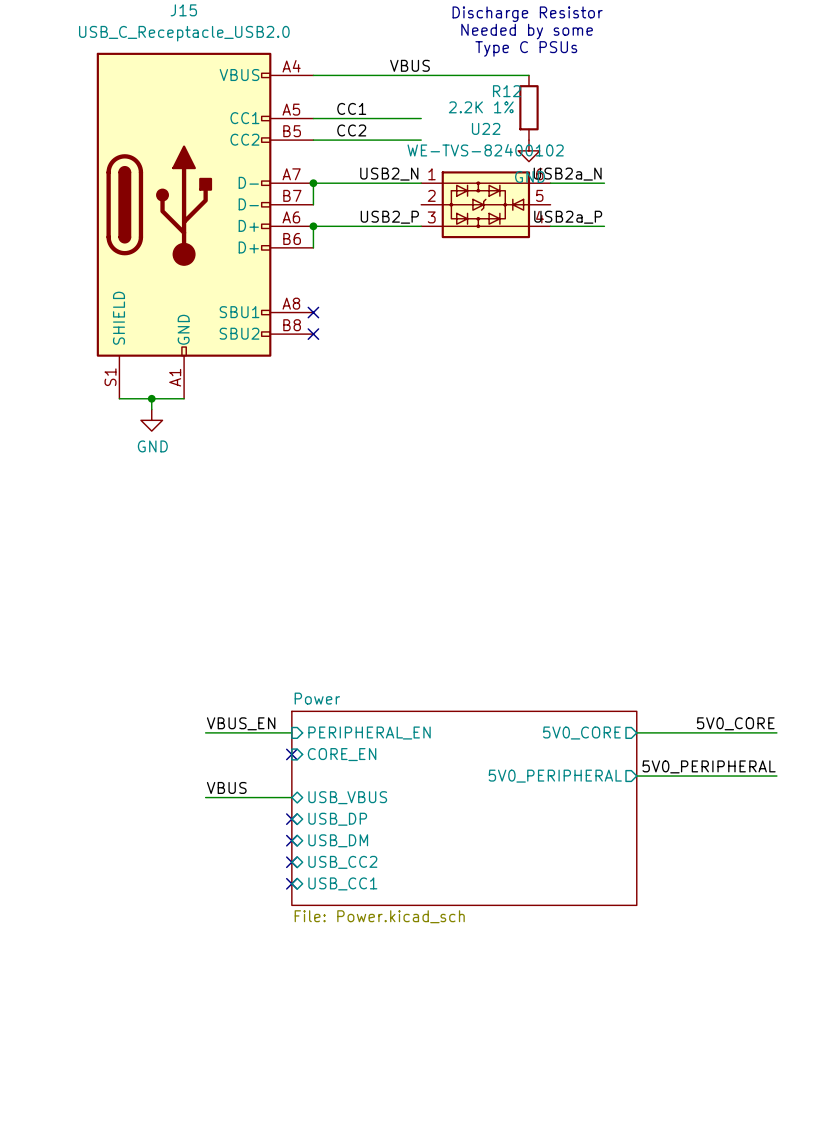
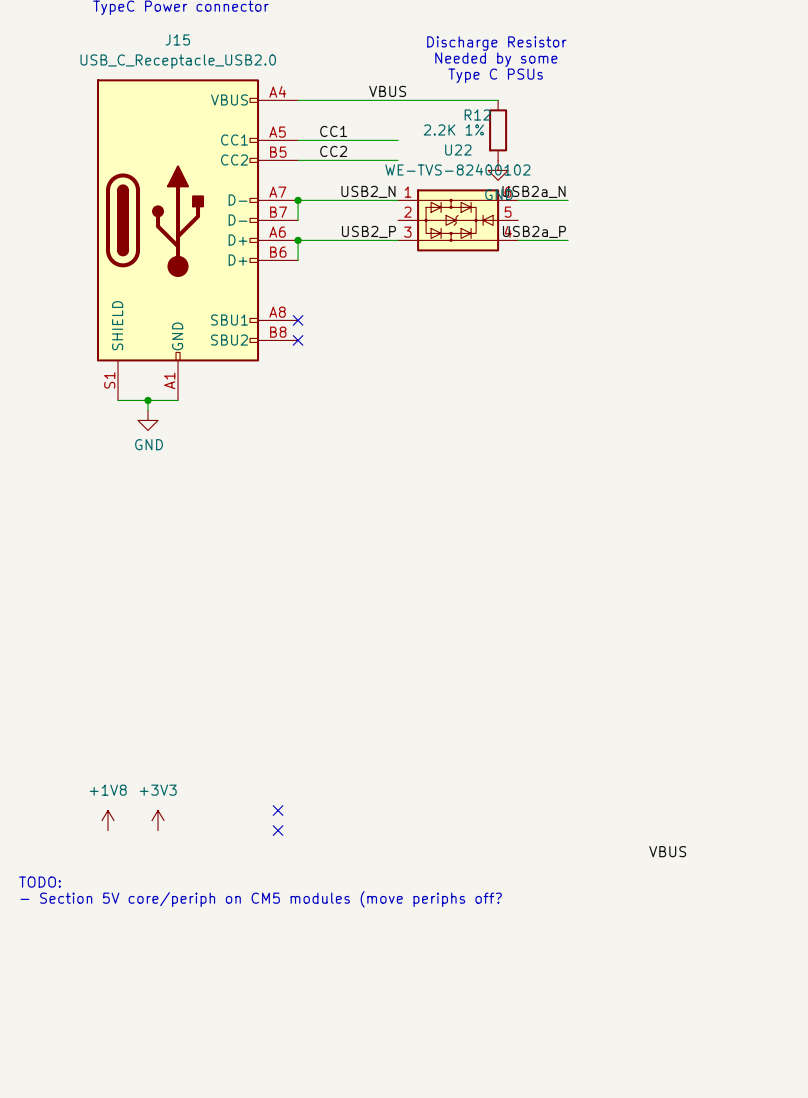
label: VBUS_EN (241, 723) -> none
label: 5V0_CORE (735, 723) -> none
wire: (205, 732) (291, 732) -> none
wire: (636, 732) (776, 732) -> none
sheet pin: PERIPHERAL_EN (369, 733) -> none
sheet pin: 5V0_CORE (581, 733) -> none
no-connect mark: (291, 754) -> none
sheet pin: CORE_EN (342, 754) -> none
label: 5V0_PERIPHERAL (709, 766) -> none
sheet pin: 5V0_PERIPHERAL (555, 776) -> none
wire: (636, 776) (776, 776) -> none
label: VBUS (226, 787) -> none
wire: (205, 797) (291, 797) -> none
sheet pin: USB_VBUS (347, 797) -> none
sheet Power: File: Power.kicad_sch (464, 808) -> none
no-connect mark: (291, 819) -> none
sheet pin: USB_DP (337, 819) -> none
sheet pin: USB_DM (338, 840) -> none
power symbol: none -> +1V8 (108, 820)
power symbol: none -> +3V3 (158, 820)
sheet pin: USB_CC2 (342, 862) -> none
no-connect mark: (291, 883) -> none
sheet pin: USB_CC1 (342, 883) -> none
label: none -> VBUS (667, 851)
text: none -> TODO: (39, 882)
text: none -> - Section 5V core/periph on CM5 modules (move periphs off? (261, 899)

